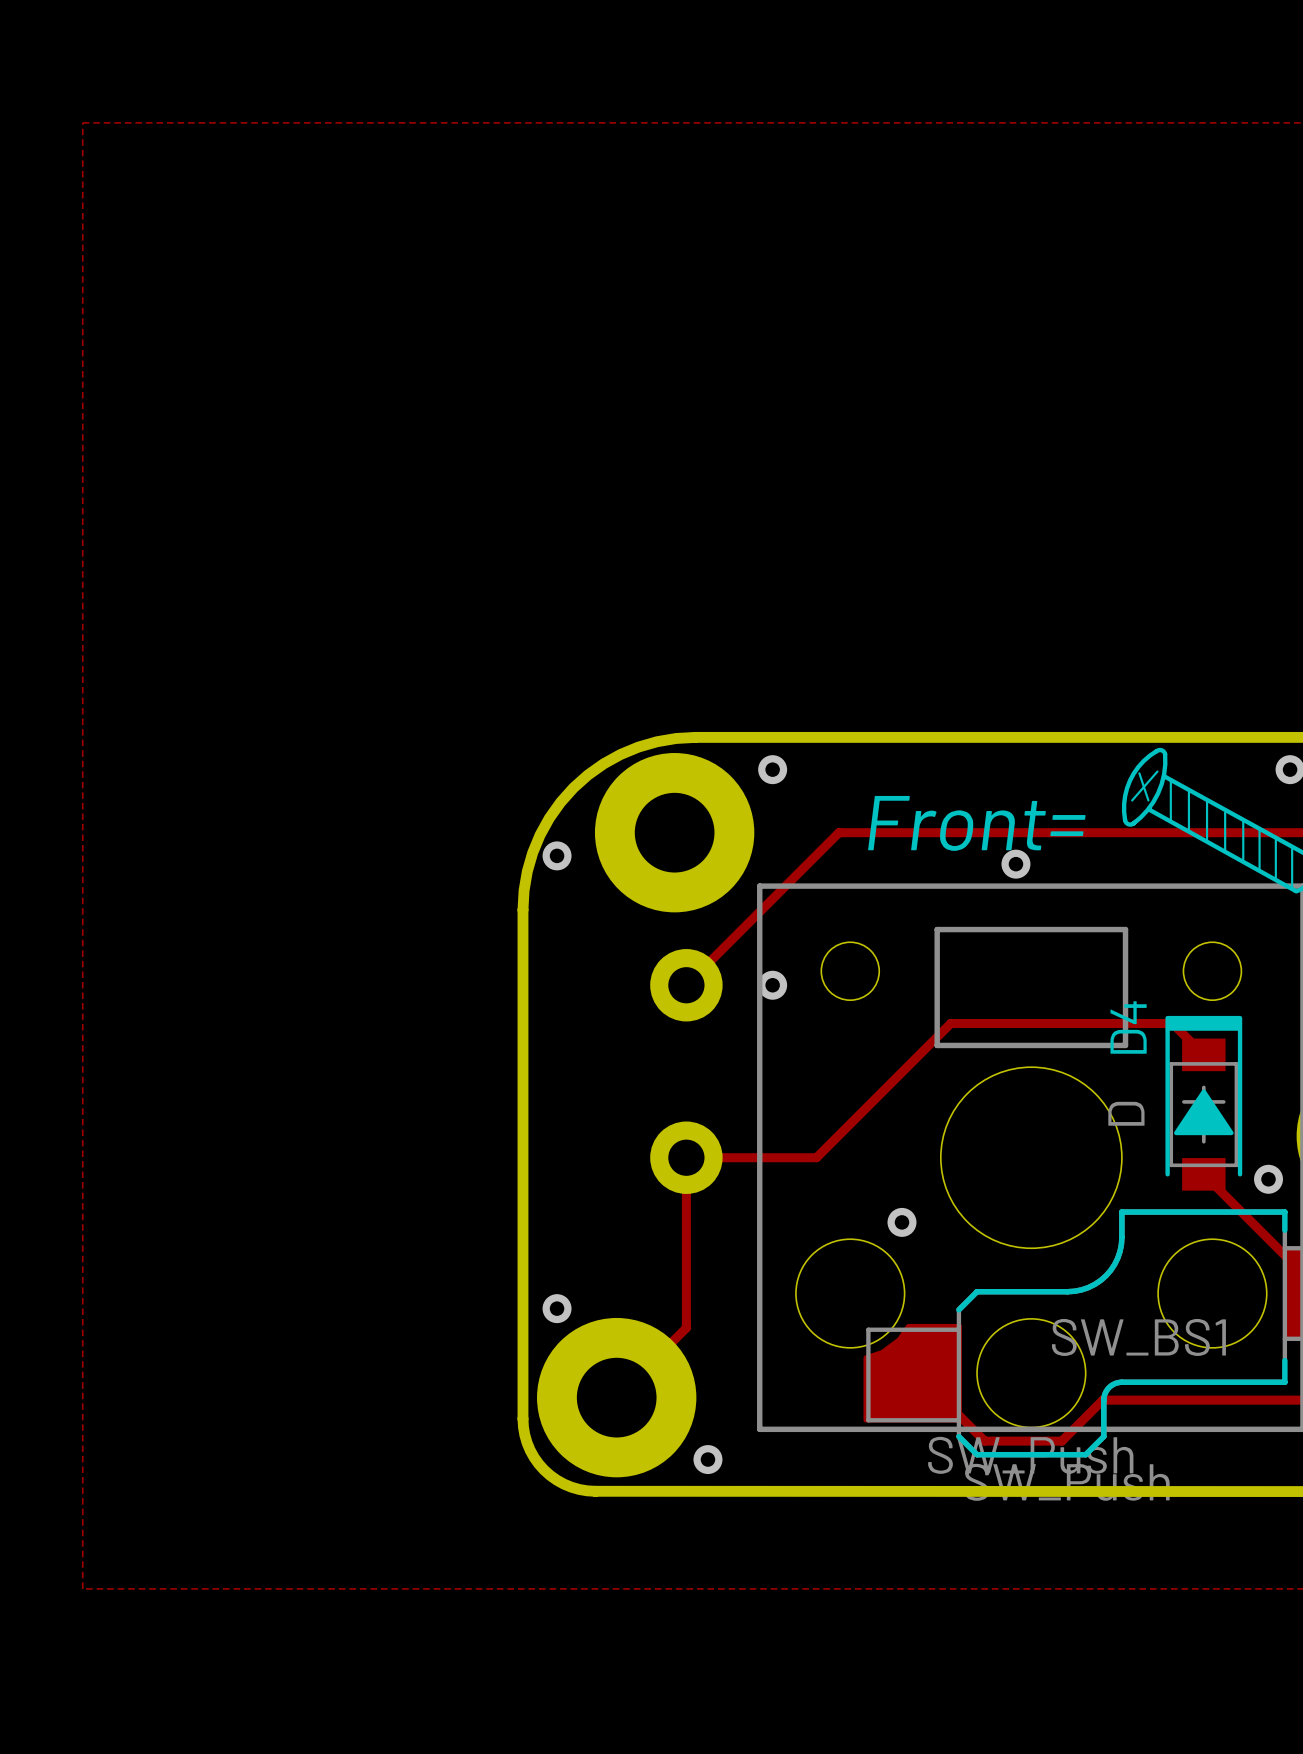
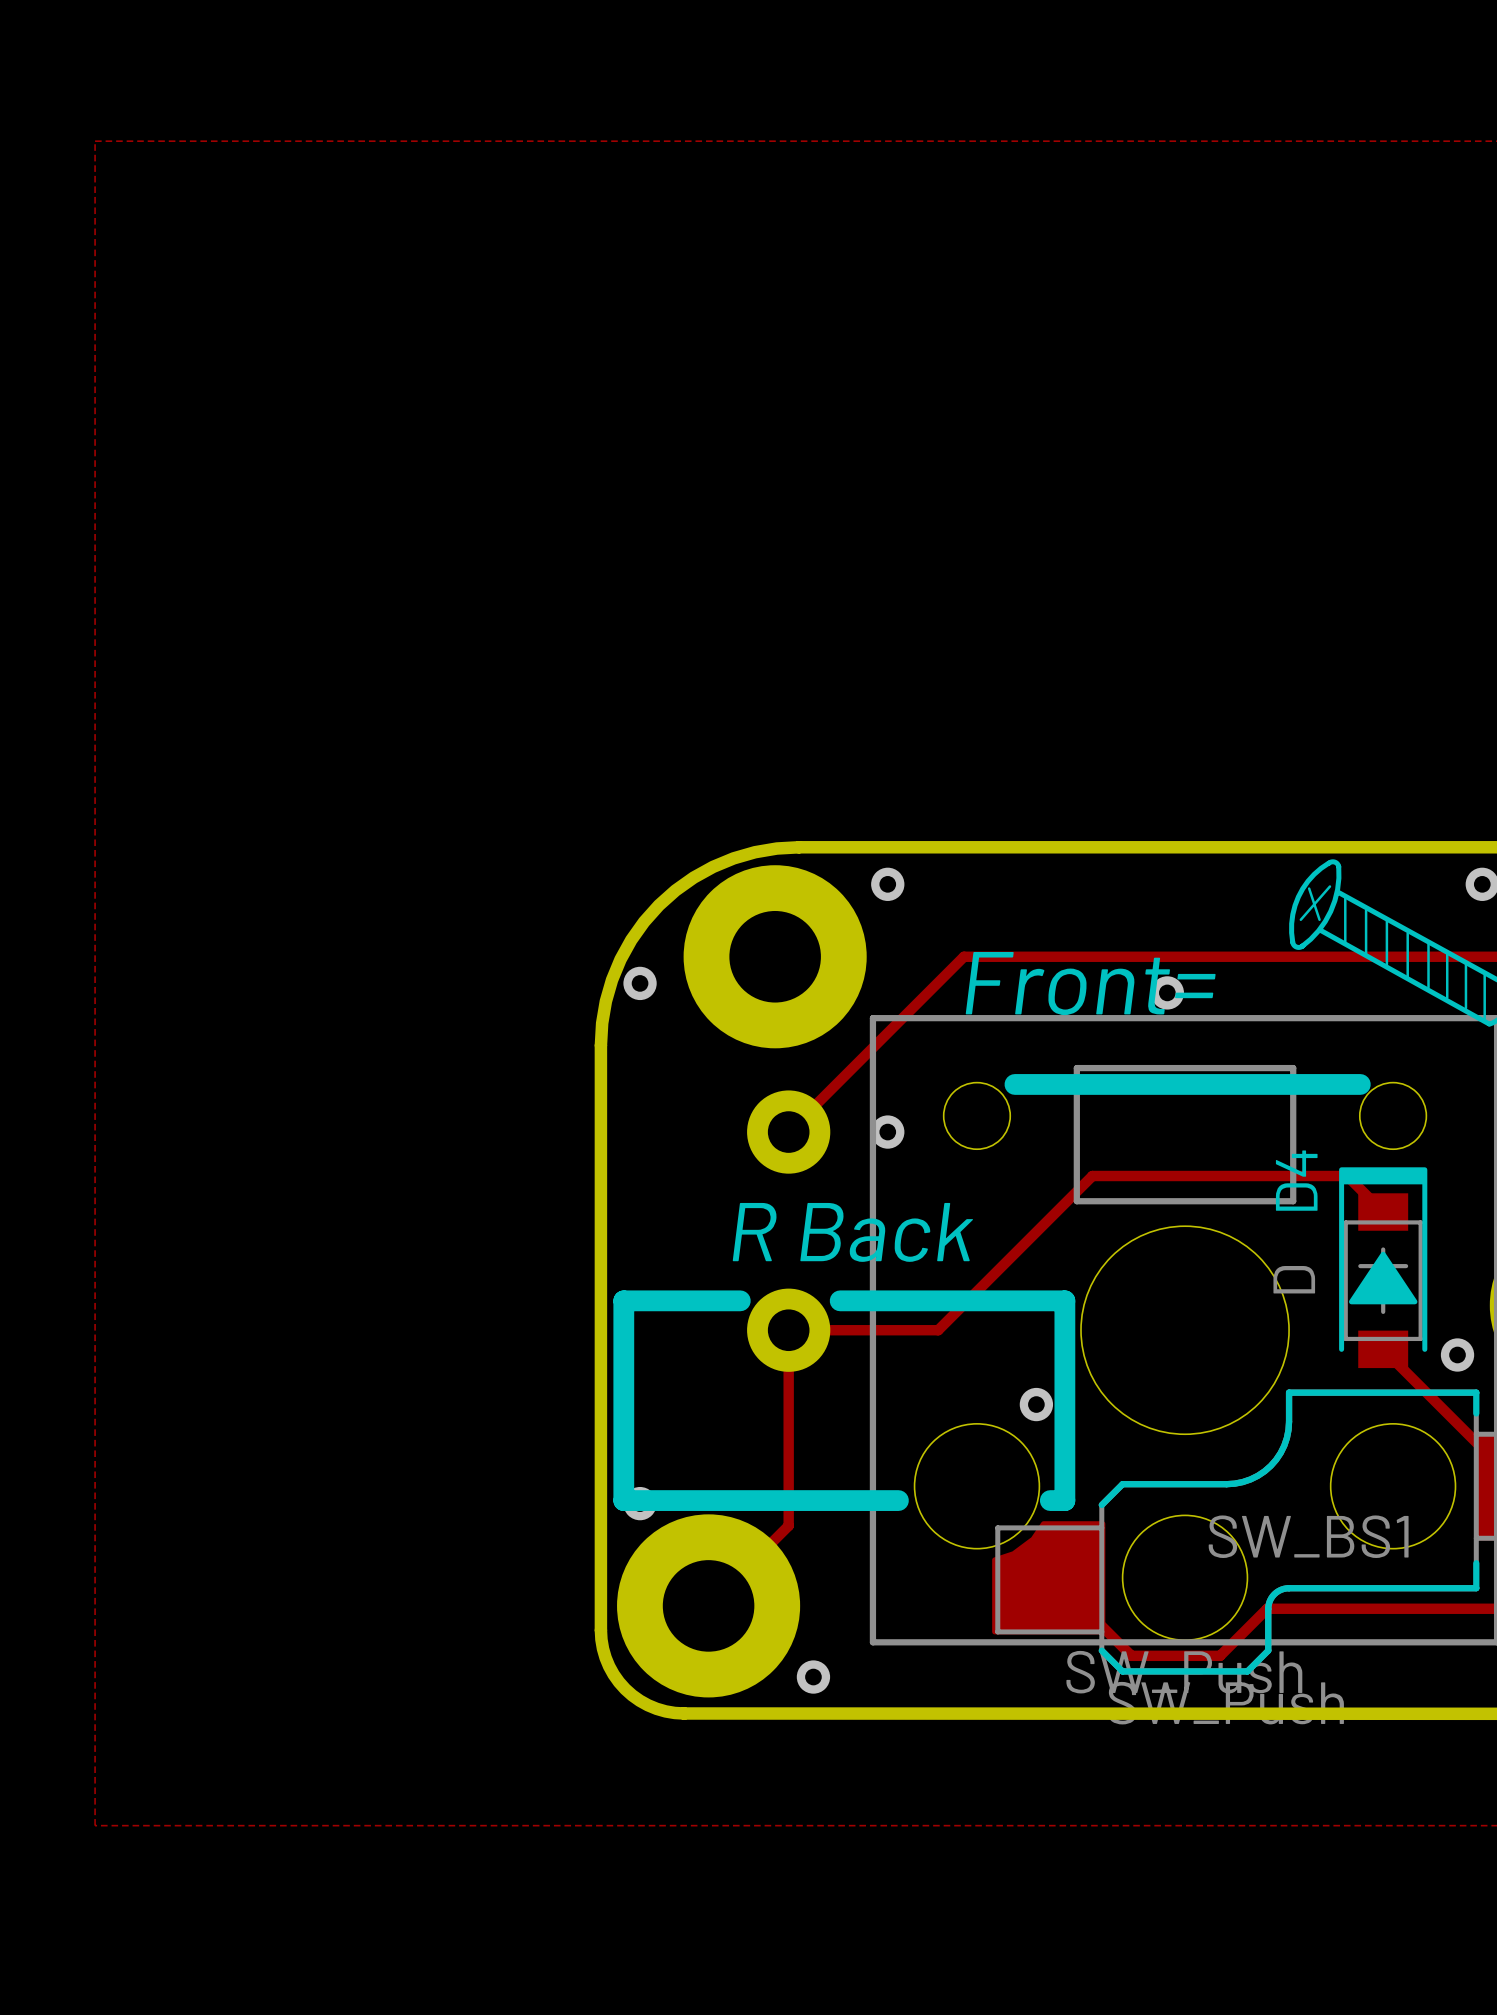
text position: Front= (976, 823) -> Front= (1090, 983)
line: none -> (1014, 1084) (1360, 1084)
text: none -> R Back (852, 1232)
line: none -> (740, 1300) (623, 1300) (623, 1500) (898, 1500)
line: none -> (840, 1300) (1064, 1300) (1064, 1500) (1050, 1500)

